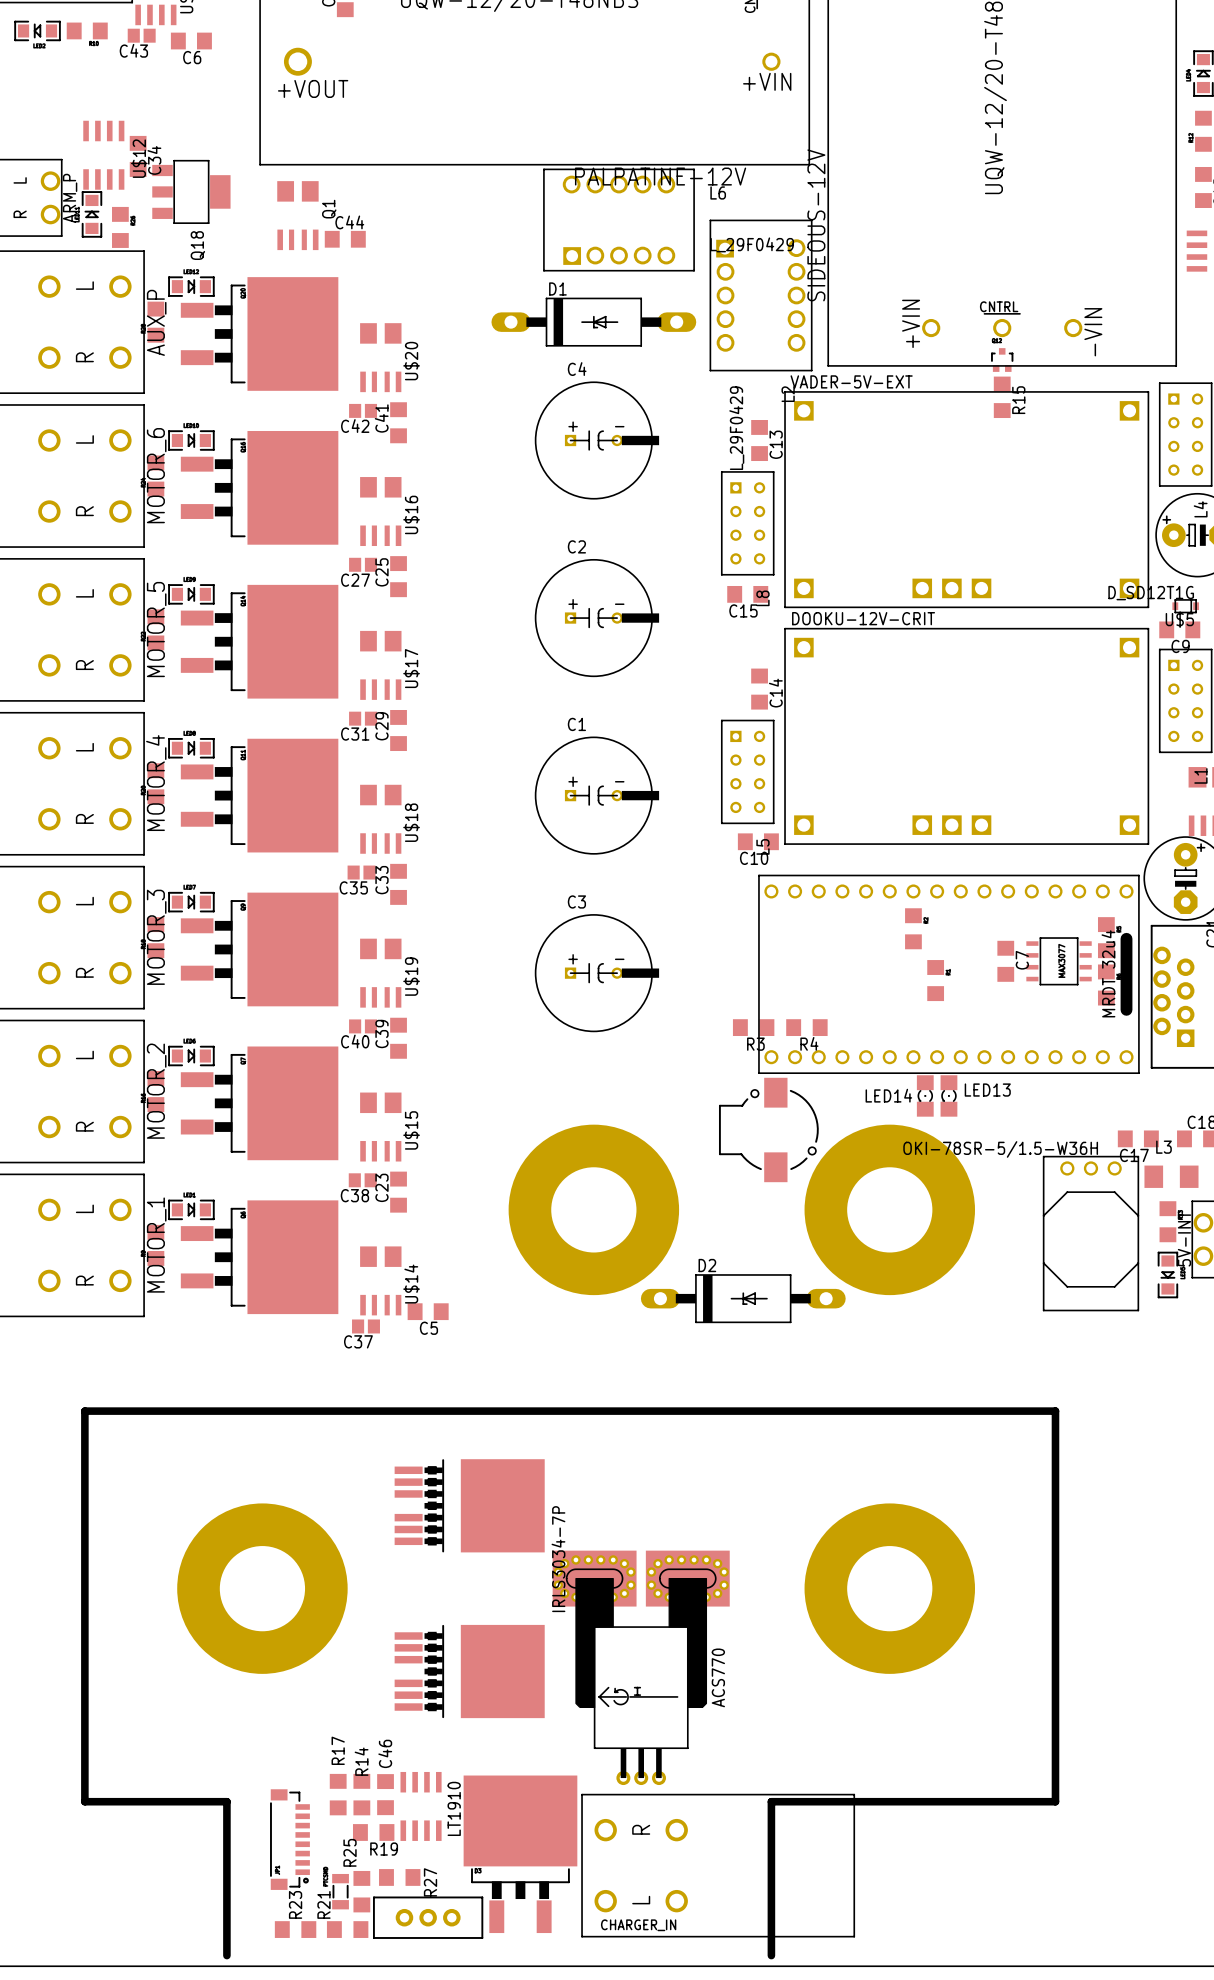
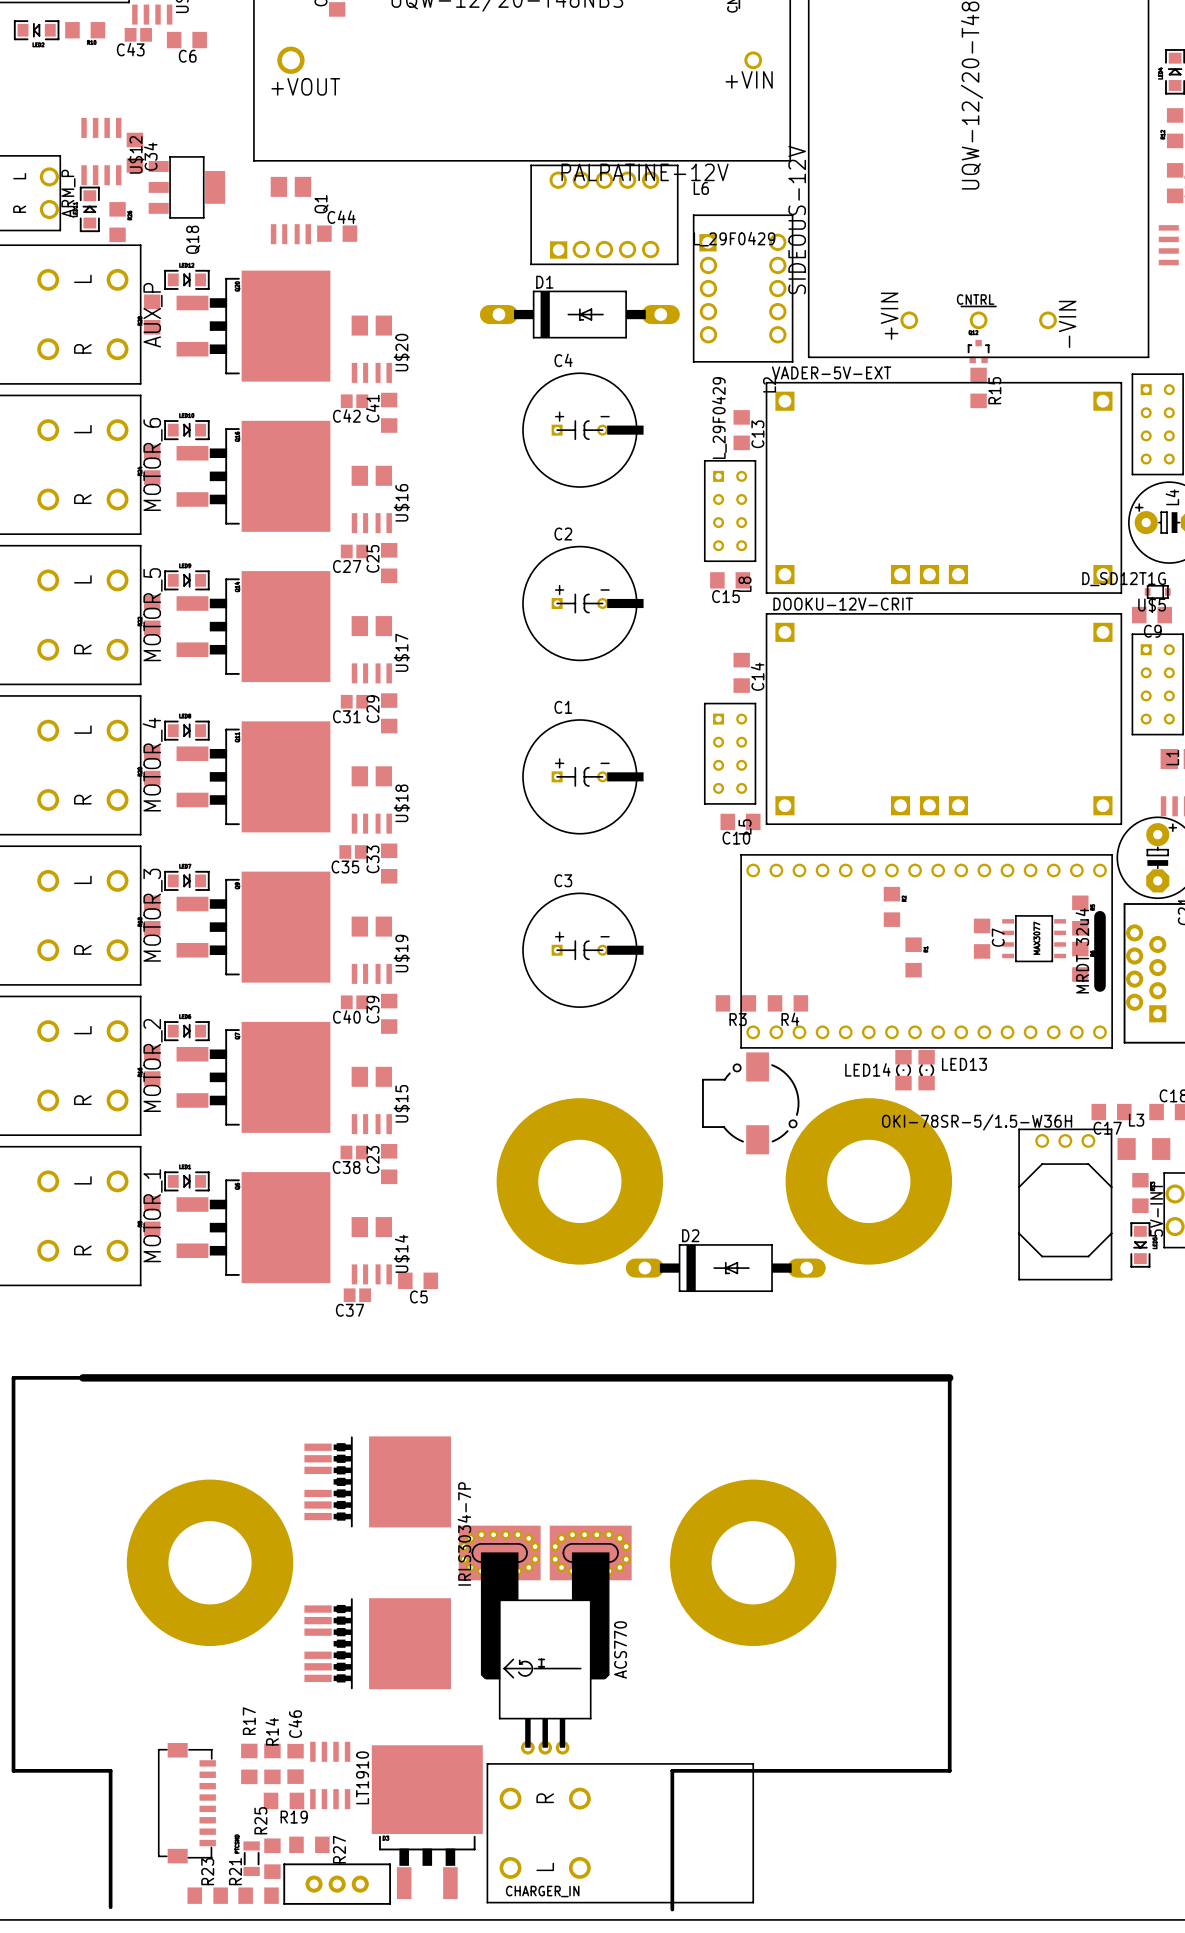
line: (84, 1411) (84, 1801) (226, 1801) (226, 1955) -> (82, 1377) (13, 1377) (13, 1770) (110, 1770) (110, 1907)
line: (972, 1411) (1055, 1411) (1055, 1801) (771, 1801) (771, 1955) -> (949, 1377) (949, 1770) (672, 1770) (672, 1909)
IRLS3034-7P position: (469, 1505) -> (377, 1481)
part position: (262, 1588) -> (210, 1562)
part position: (889, 1588) -> (753, 1562)
part position: (641, 1667) -> (545, 1640)
part position: (469, 1671) -> (377, 1643)
R17 position: (338, 1794) -> (249, 1763)
R14 position: (361, 1794) -> (272, 1763)
C46 position: (385, 1794) -> (295, 1763)
part position: (421, 1806) -> (330, 1775)
R19 position: (373, 1832) -> (283, 1800)
part: (289, 1839) -> none
part: none -> (187, 1803)
part position: (520, 1854) -> (427, 1822)
CHARGER_IN position: (718, 1865) -> (620, 1833)
R27 position: (399, 1877) -> (309, 1844)
part position: (340, 1891) -> (251, 1858)
R25 position: (361, 1891) -> (272, 1858)
part position: (428, 1917) -> (337, 1884)
R23 position: (295, 1929) -> (207, 1895)
R21 position: (347, 1929) -> (258, 1895)

